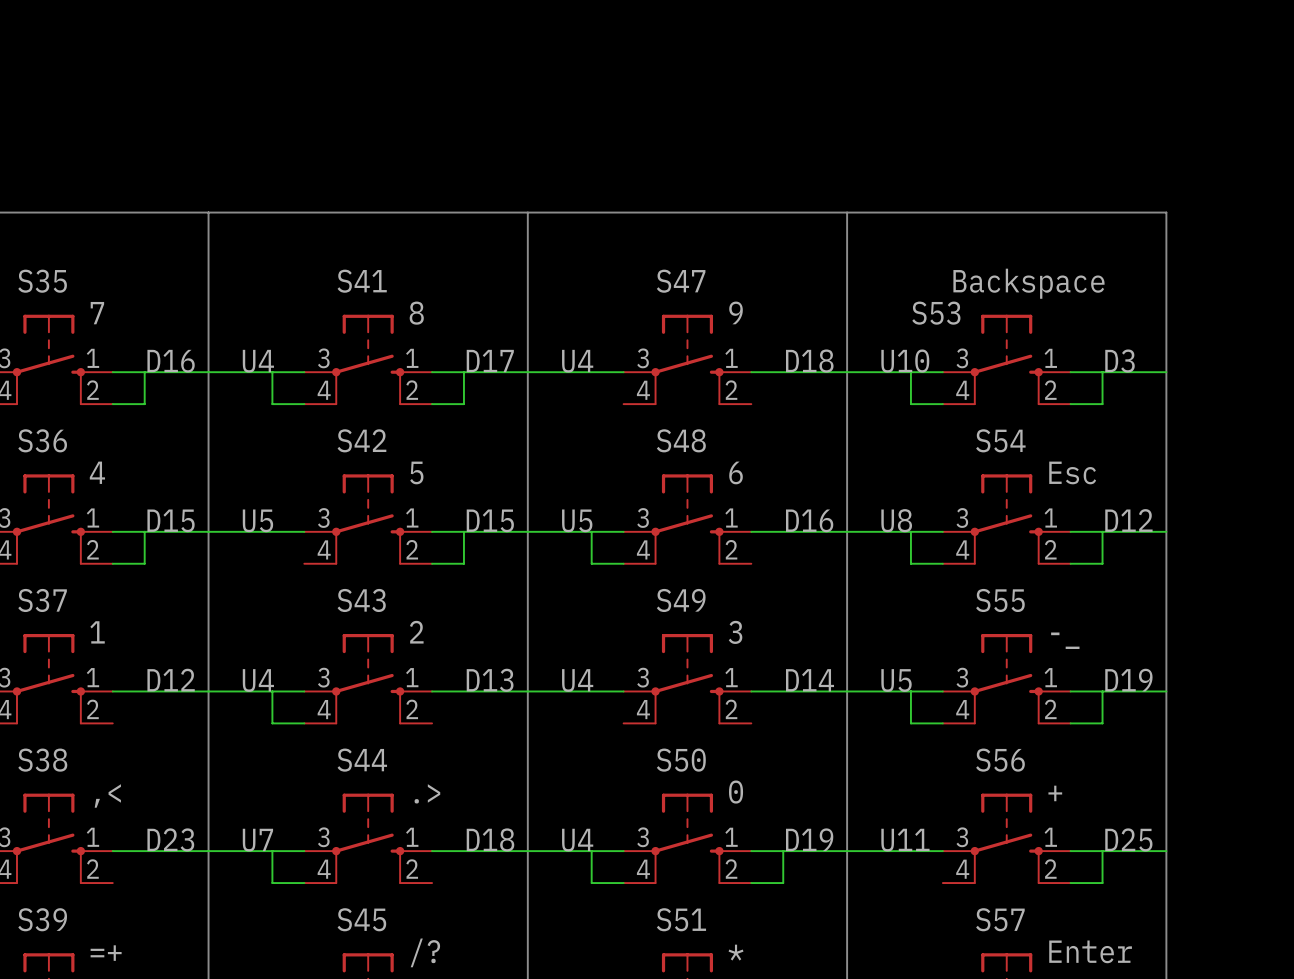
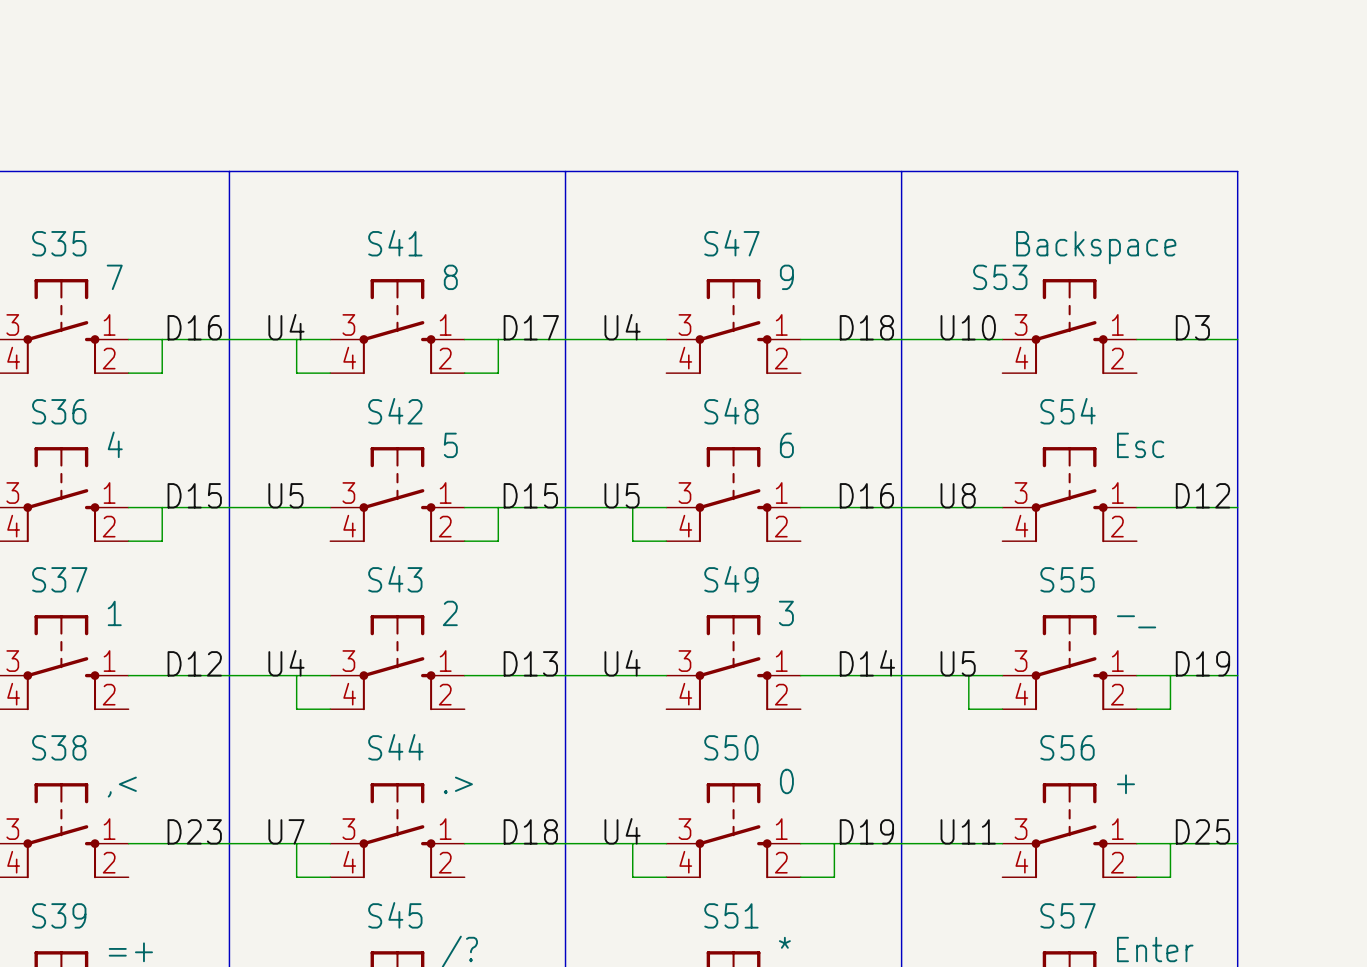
wire: (910, 372) (910, 404) (942, 404) -> none
wire: (1102, 372) (1102, 404) (1070, 404) -> none
wire: (910, 531) (910, 563) (942, 563) -> none
wire: (1102, 531) (1102, 563) (1070, 563) -> none

